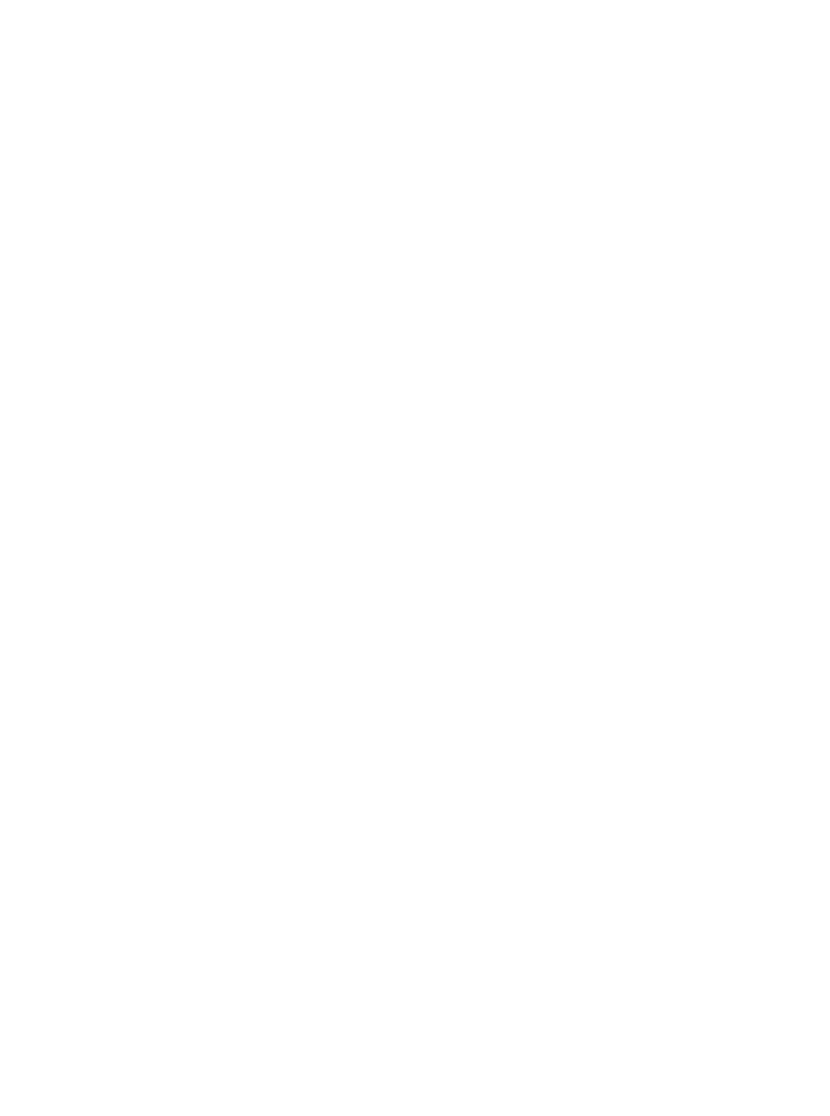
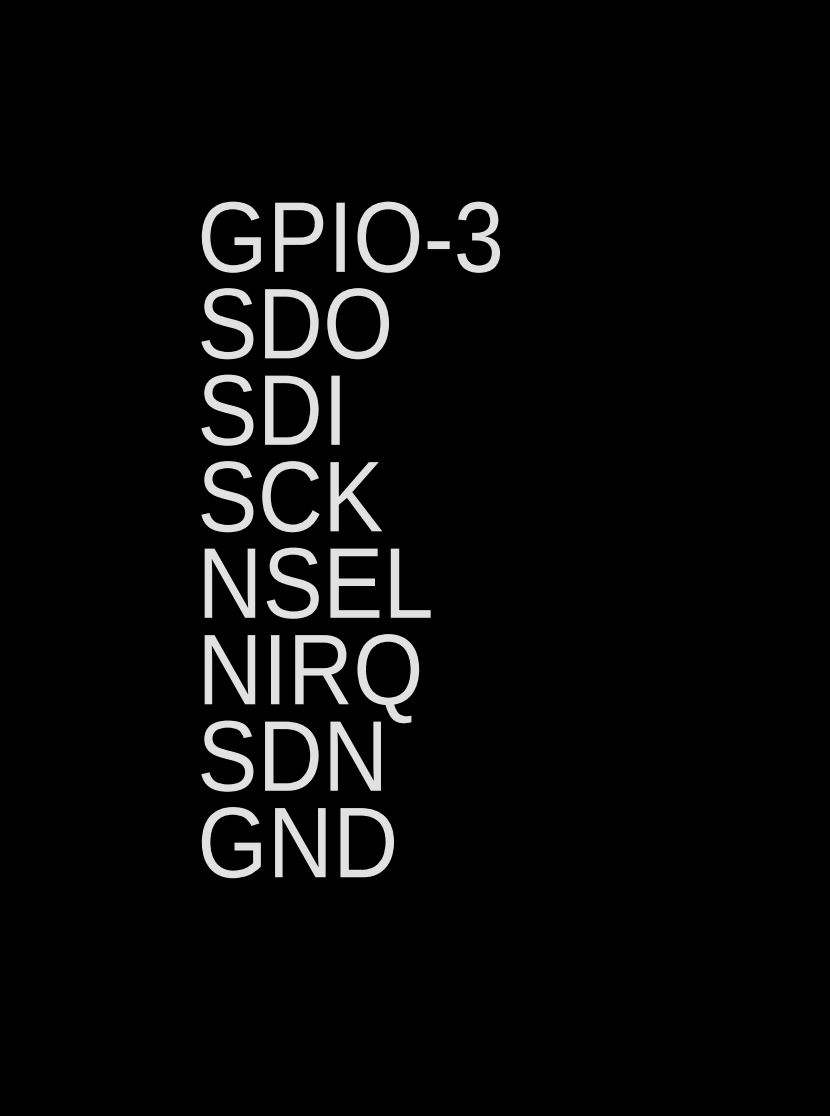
text: none -> GPIO-3 (350, 237)
text: none -> SDO (295, 323)
text: none -> SDI (270, 410)
text: none -> SCK (291, 496)
text: none -> NSEL (317, 583)
text: none -> NIRQ (311, 678)
text: none -> SDN (291, 756)
text: none -> GND (297, 842)

